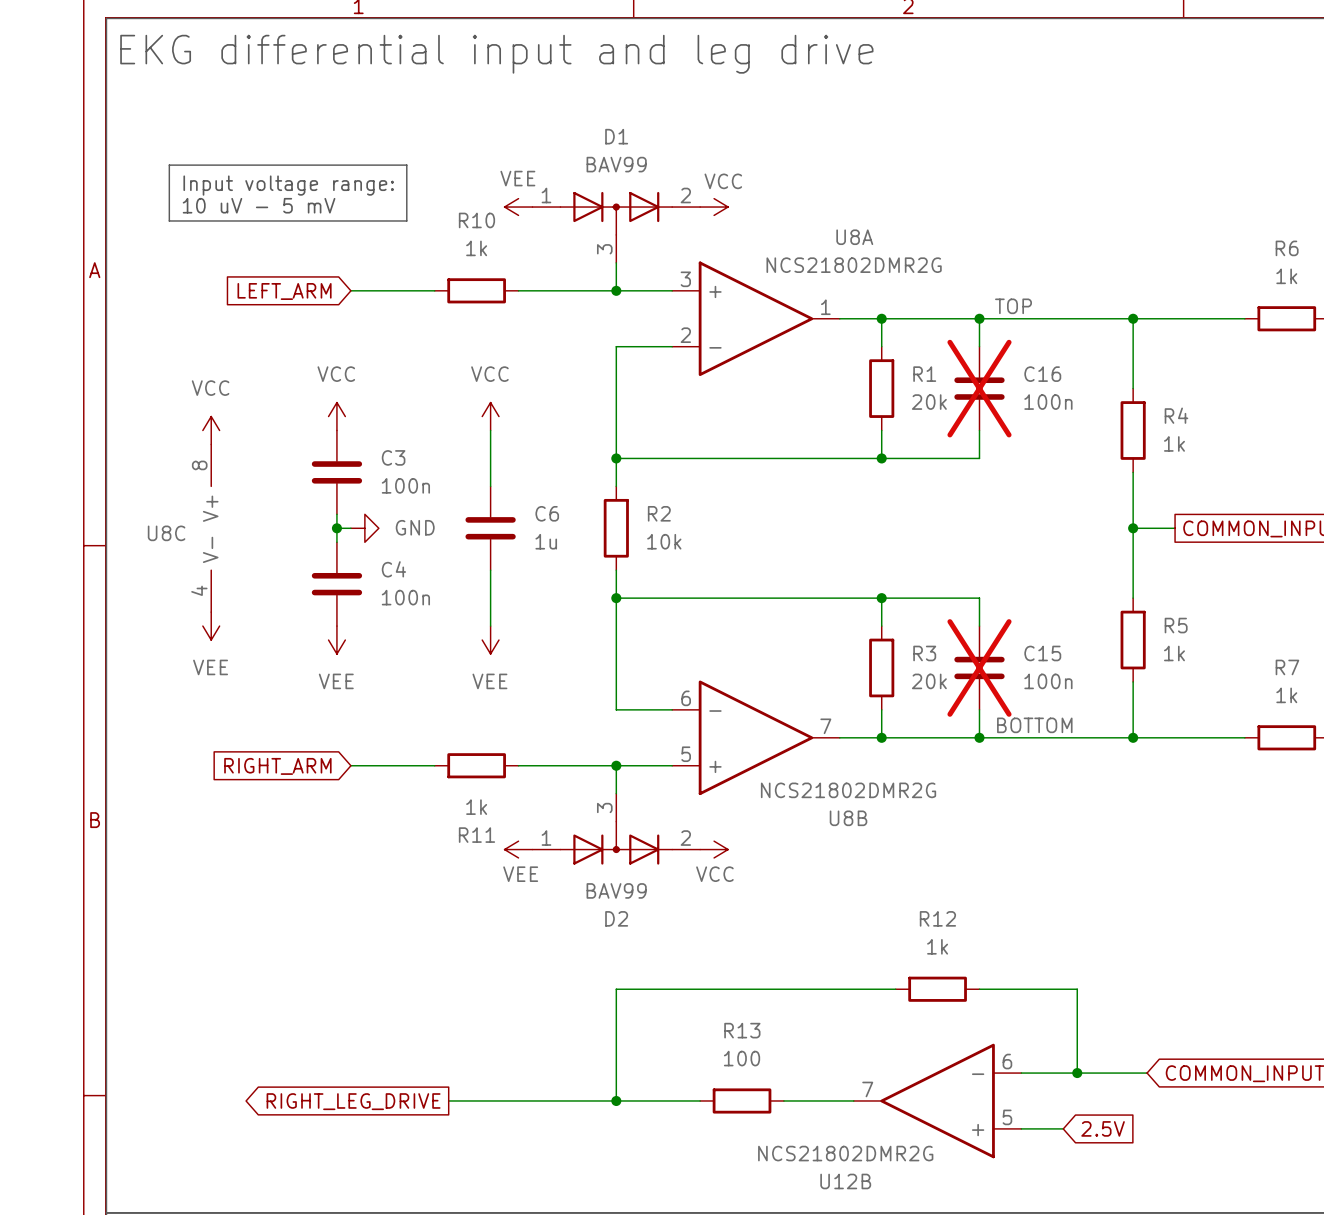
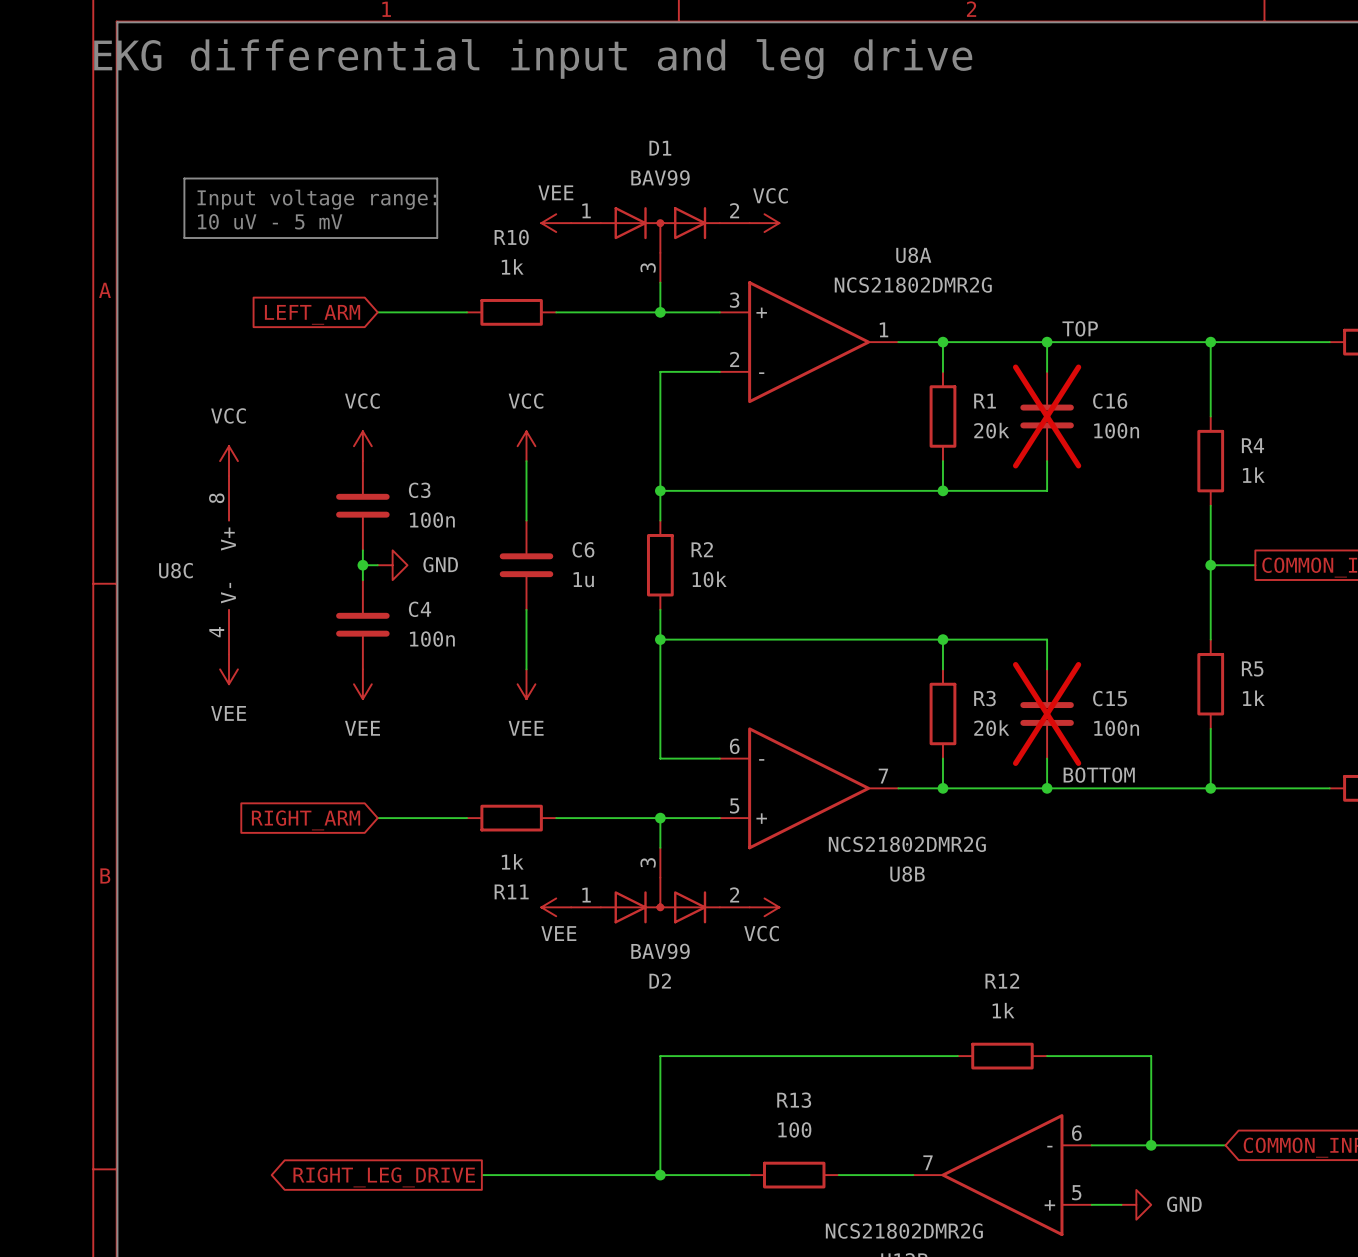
power symbol: none -> GND (1136, 1204)
global label: 2.5V (1103, 1128) -> none

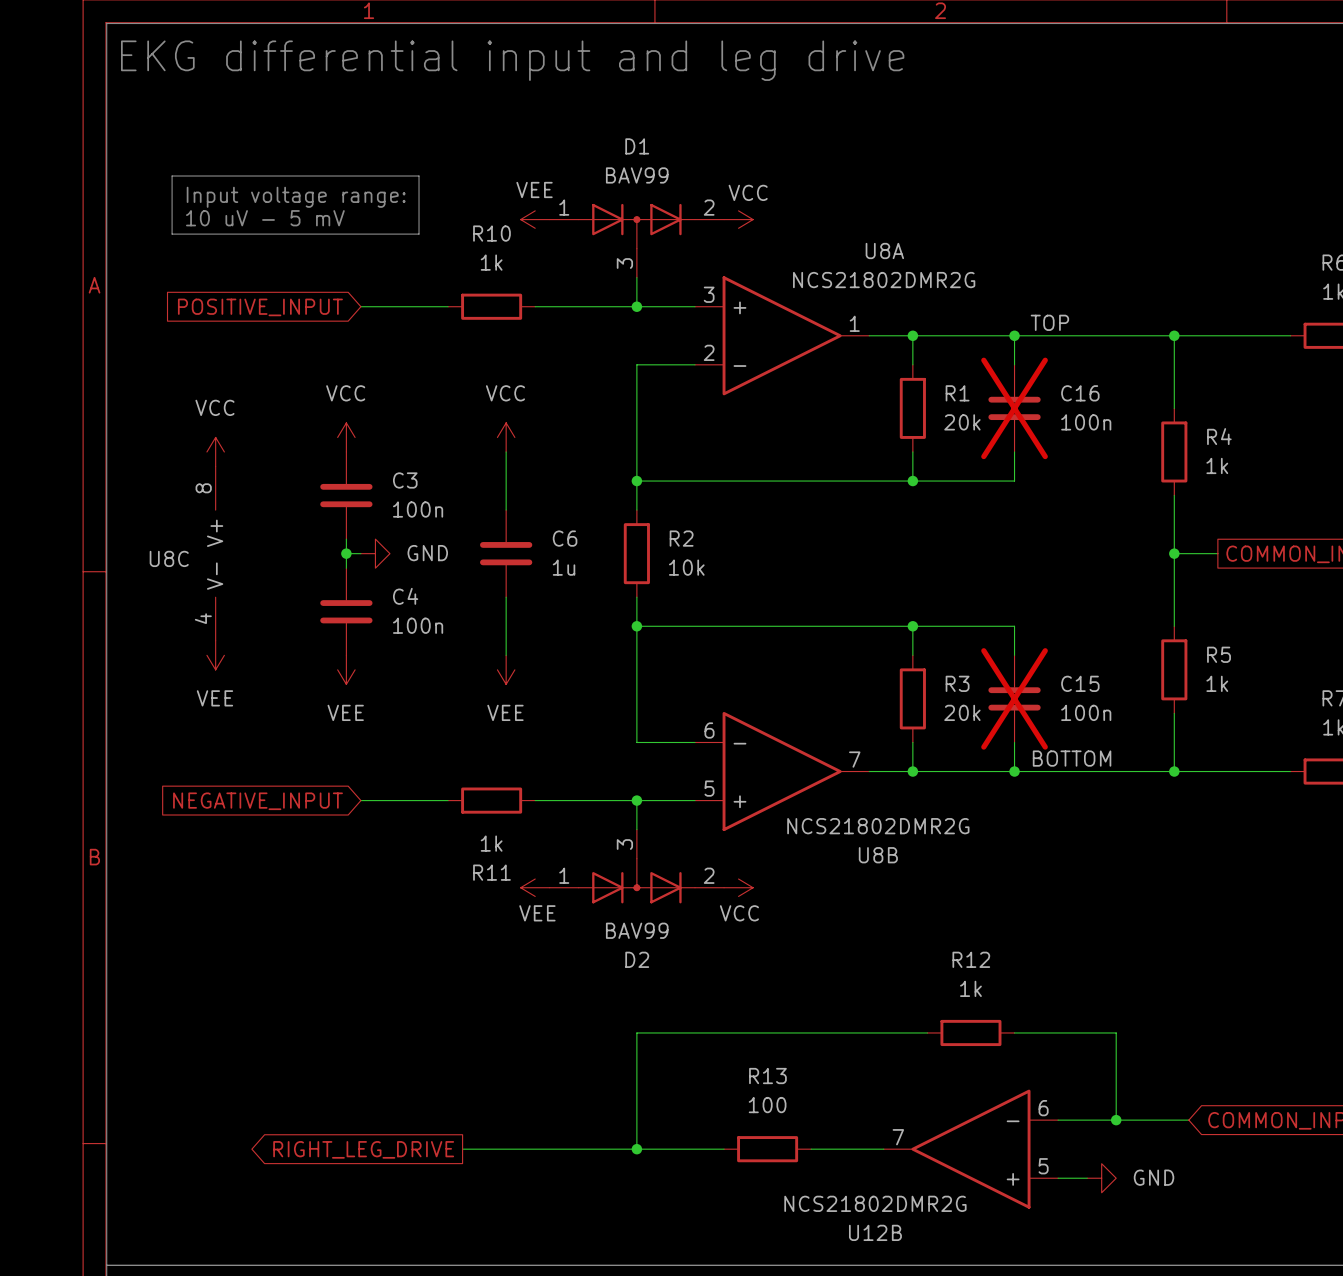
global label: LEFT_ARM (312, 314) -> POSITIVE_INPUT (260, 307)
global label: RIGHT_ARM (306, 820) -> NEGATIVE_INPUT (258, 801)

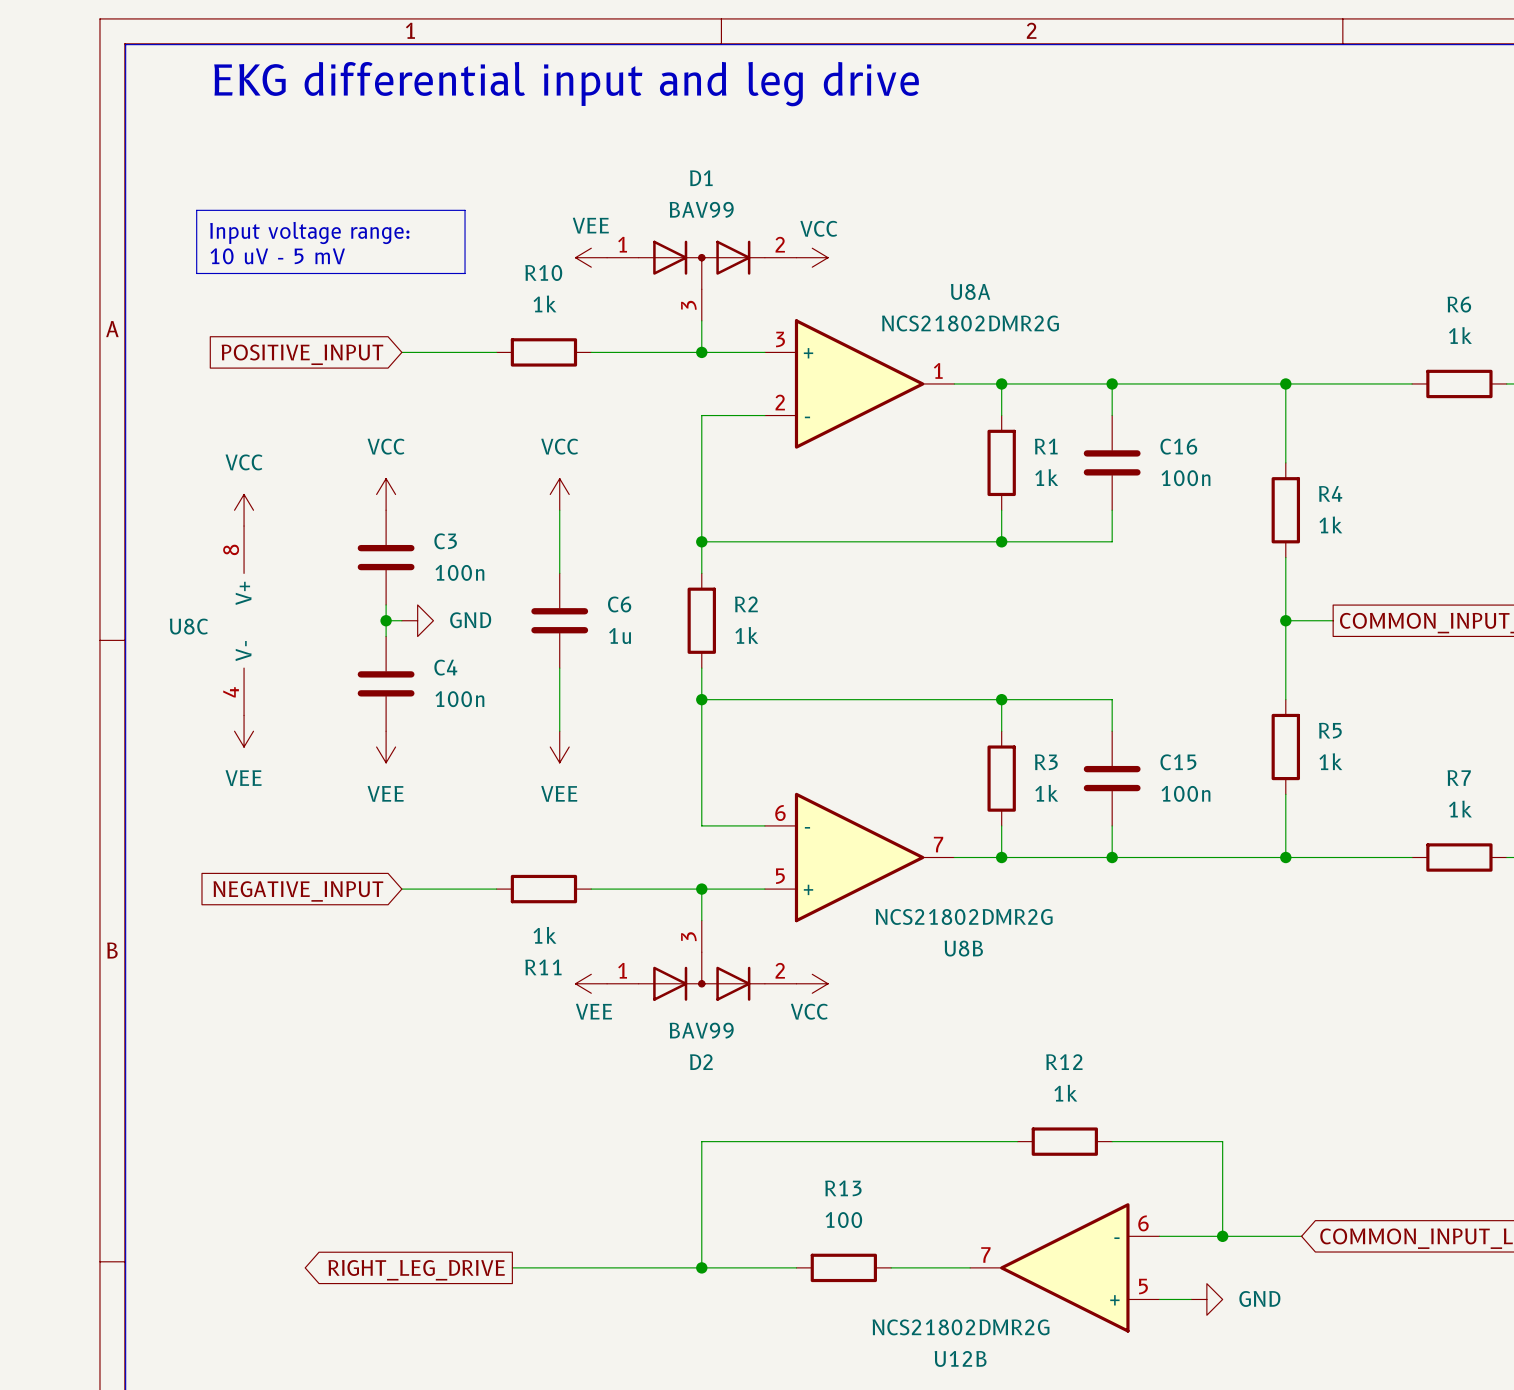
label: TOP (1049, 322) -> none
C16 do-not-place cross: (1014, 408) -> none
R1 value: 20k (962, 422) -> 1k (1046, 477)
R2 value: 10k (686, 567) -> 1k (746, 635)
C15 do-not-place cross: (1014, 698) -> none
R3 value: 20k (962, 712) -> 1k (1046, 793)
label: BOTTOM (1072, 758) -> none

